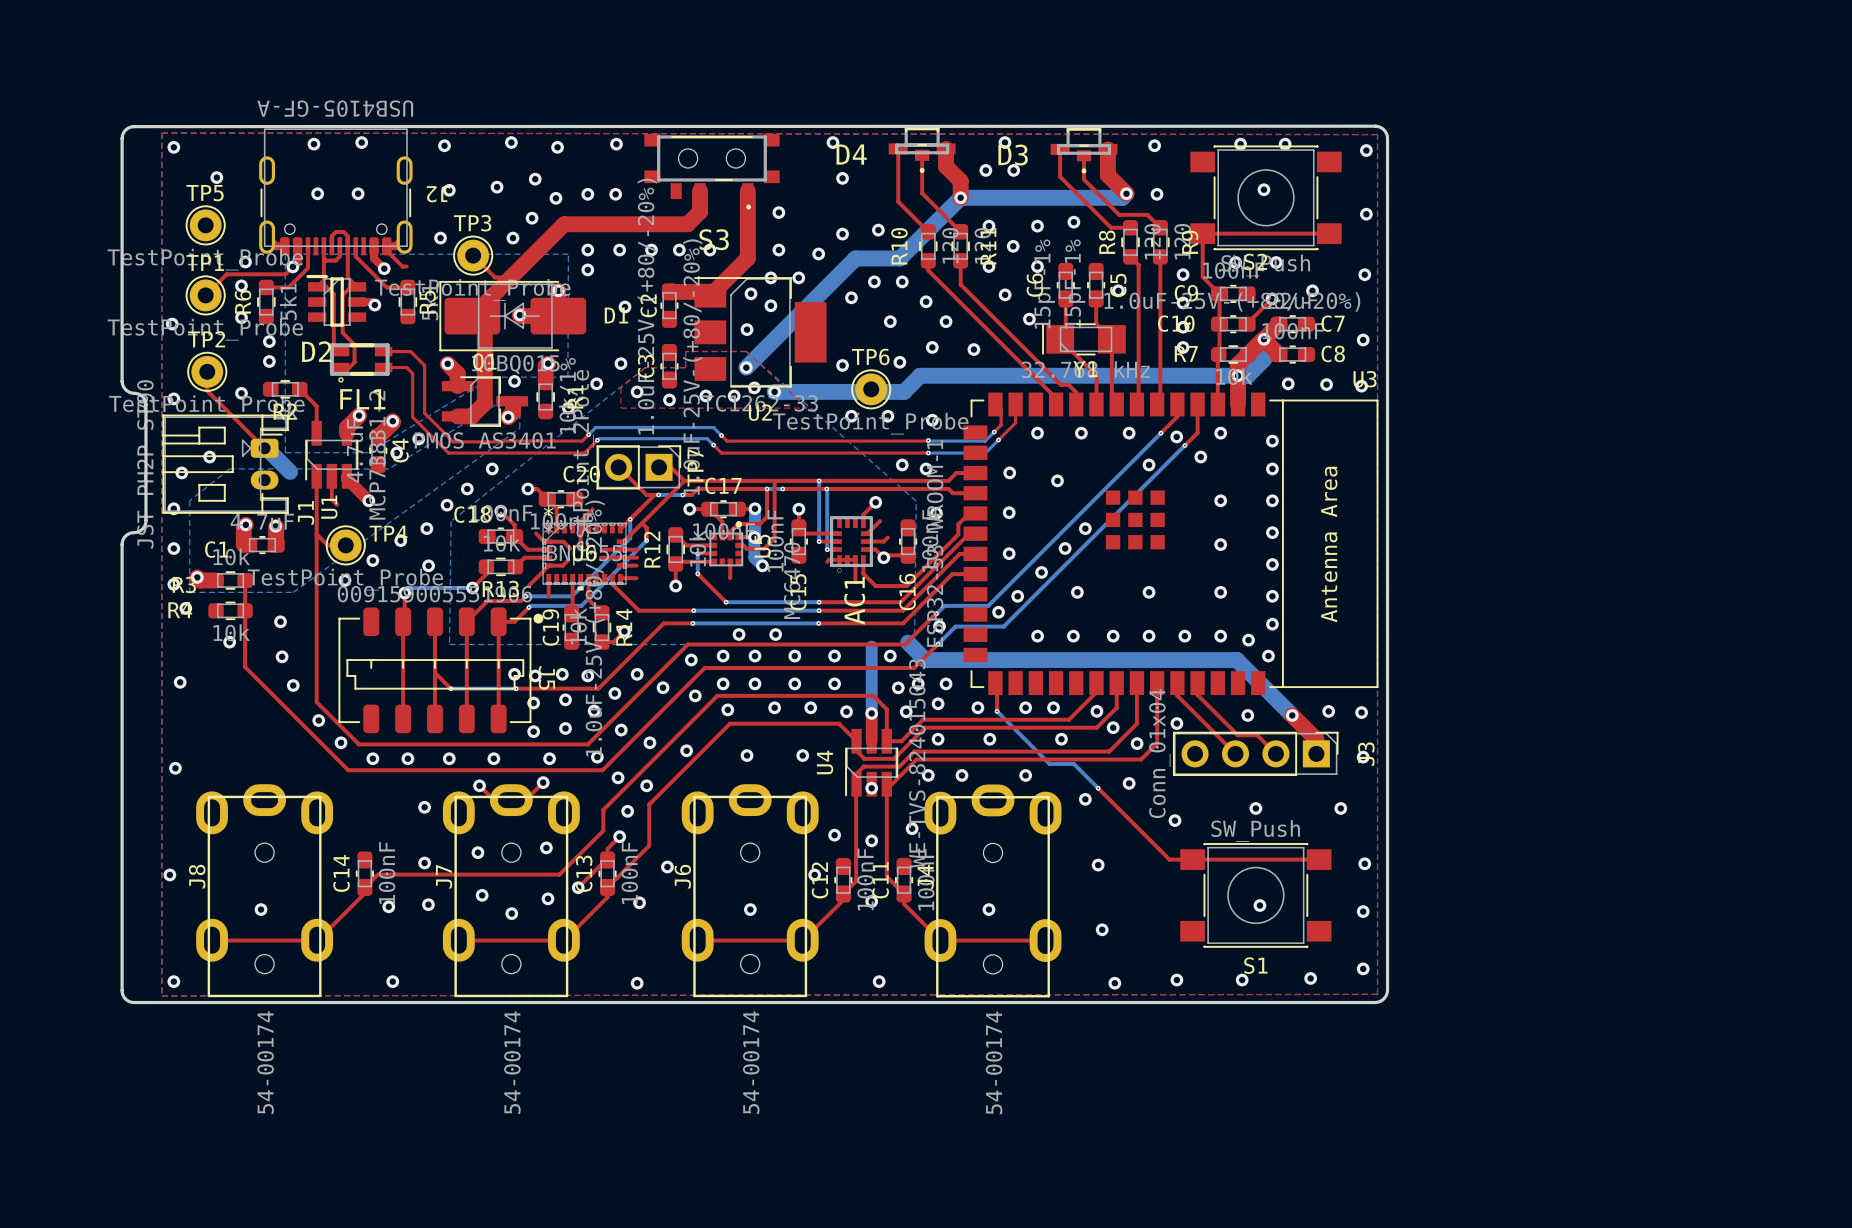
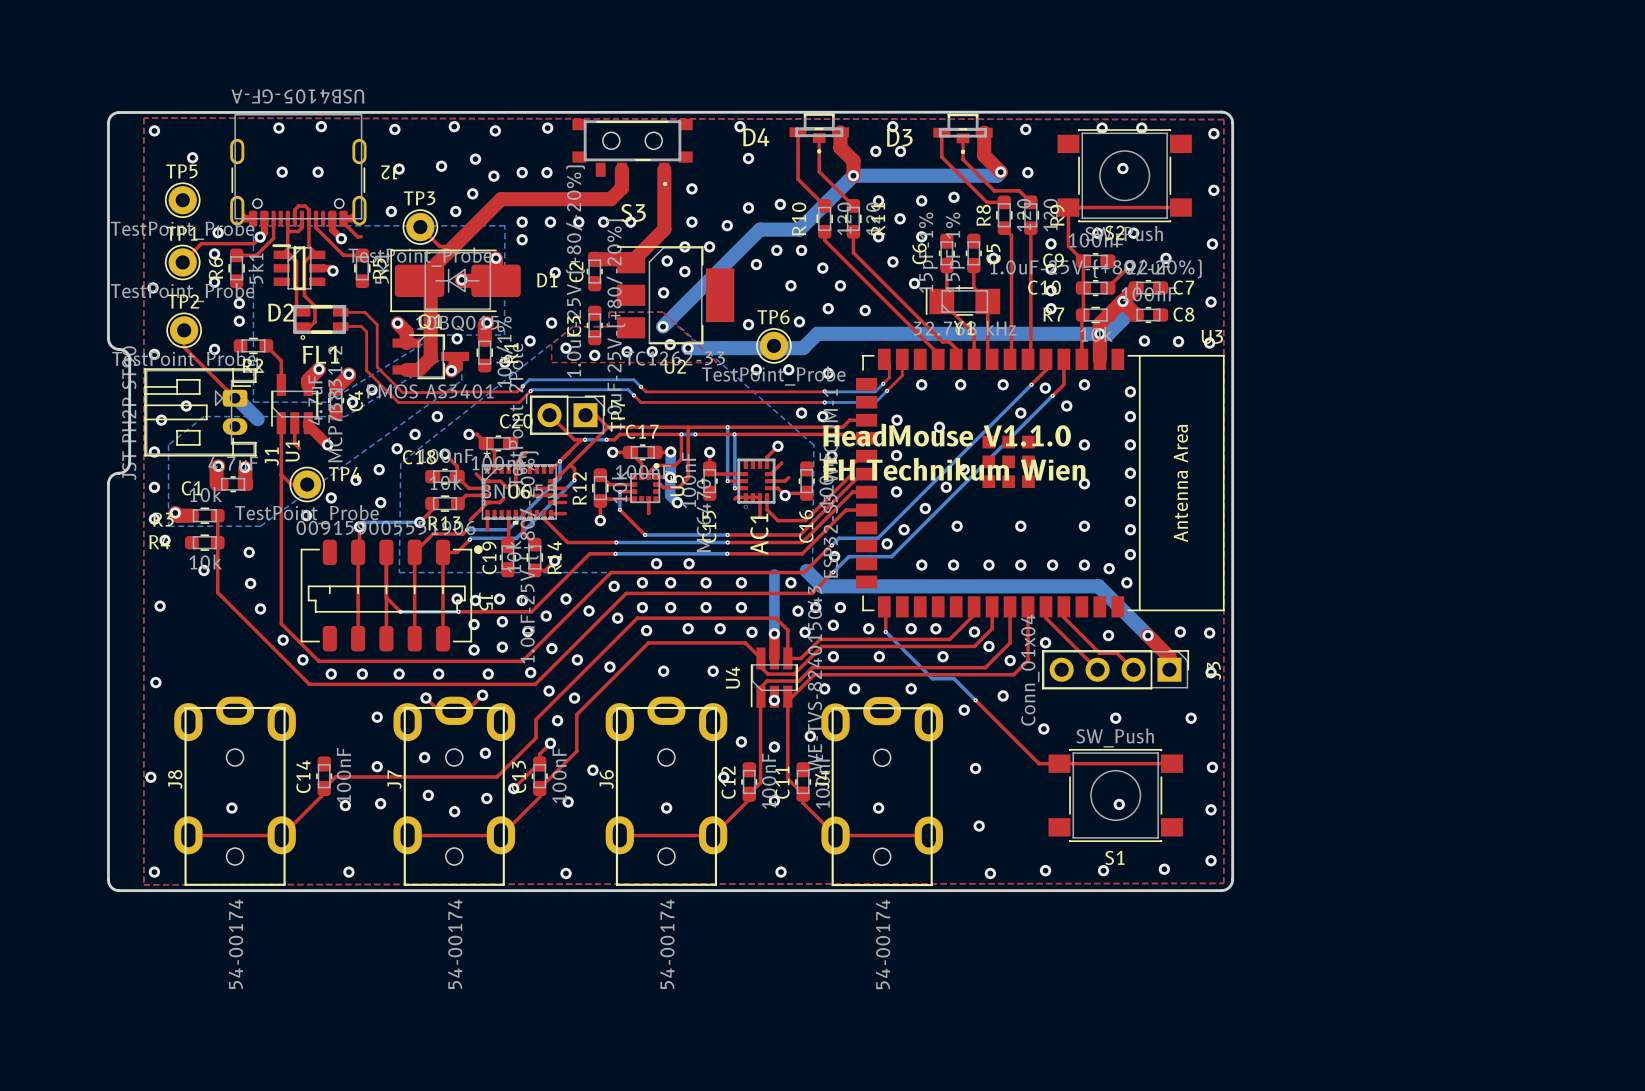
text: none -> HeadMouse V1.1.0 (947, 435)
text: none -> FH Technikum Wien (954, 469)

